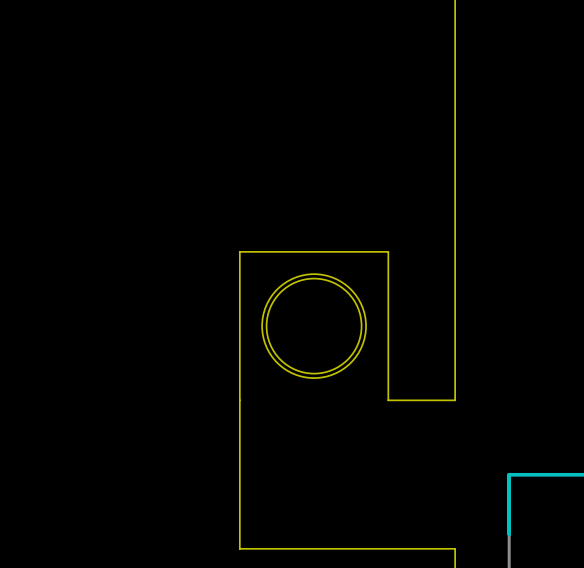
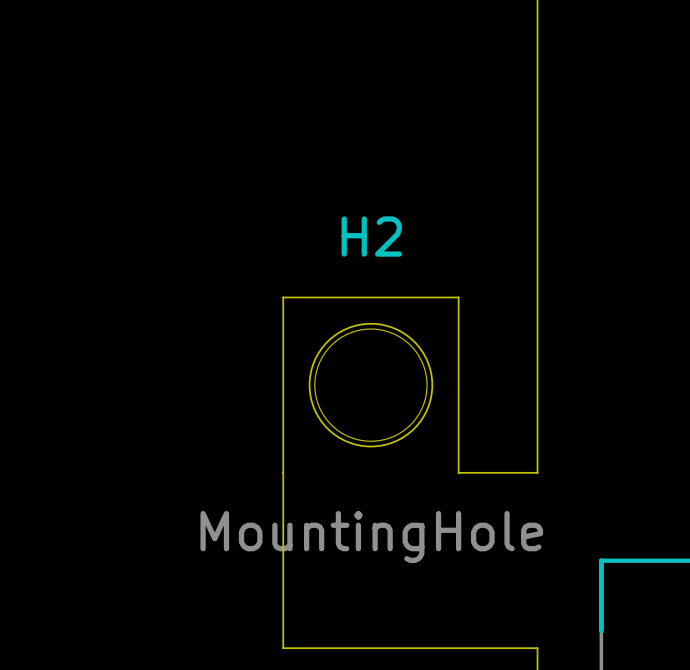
H2 name: none -> H2 (371, 236)
H2 value: none -> MountingHole (371, 536)

